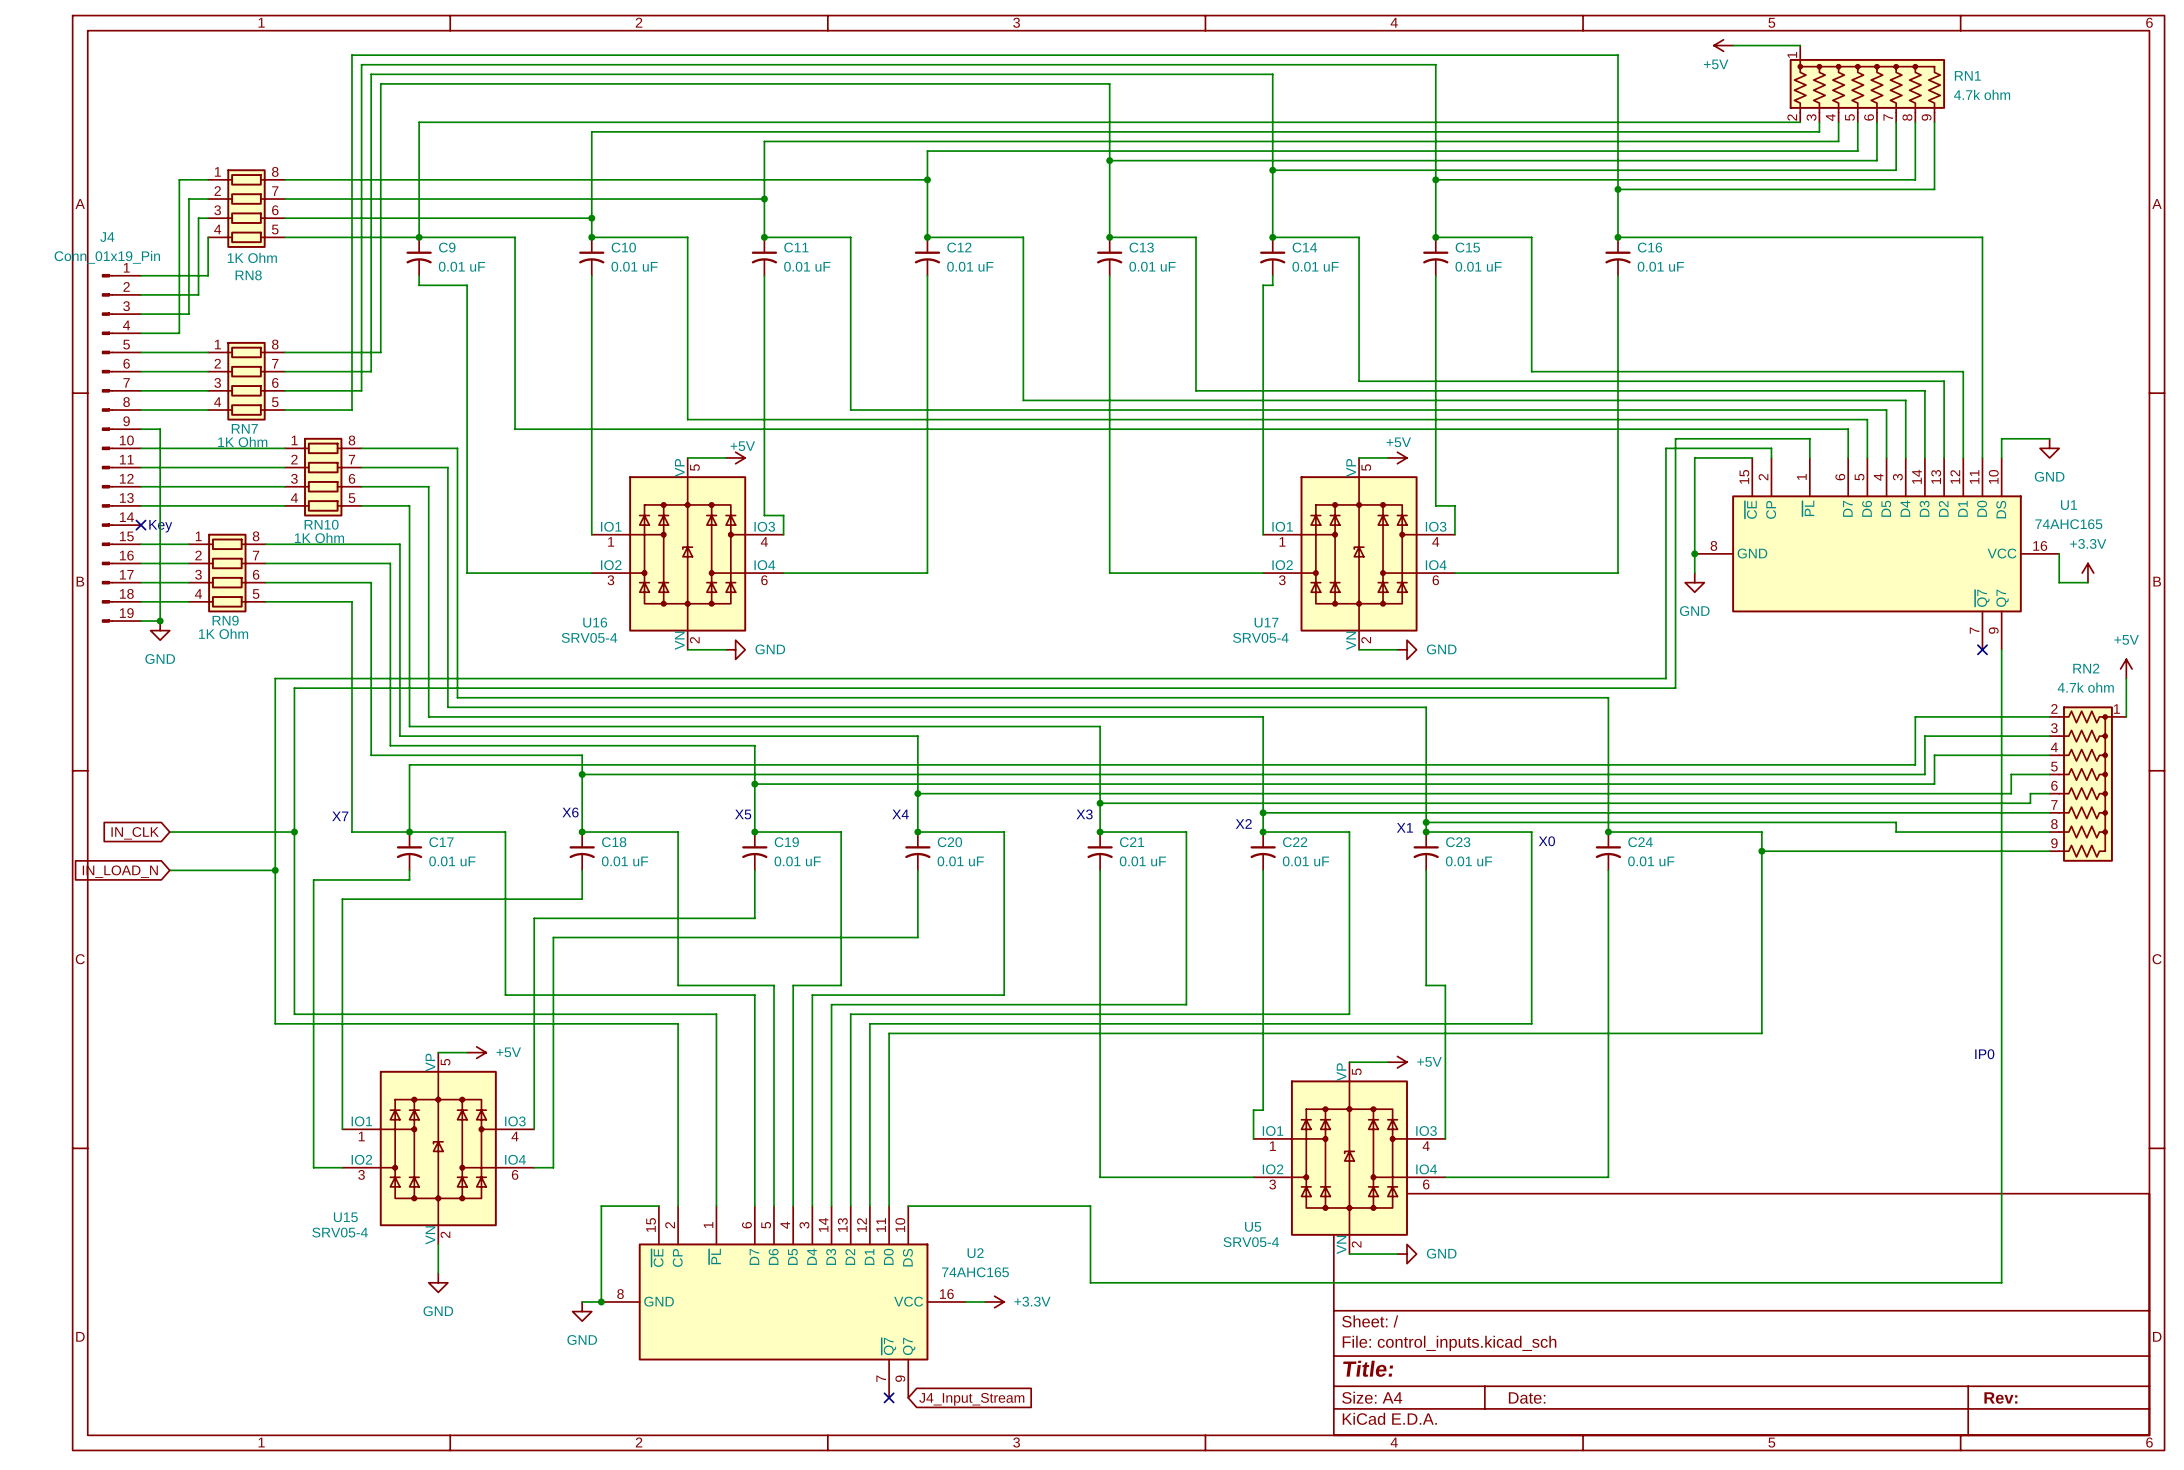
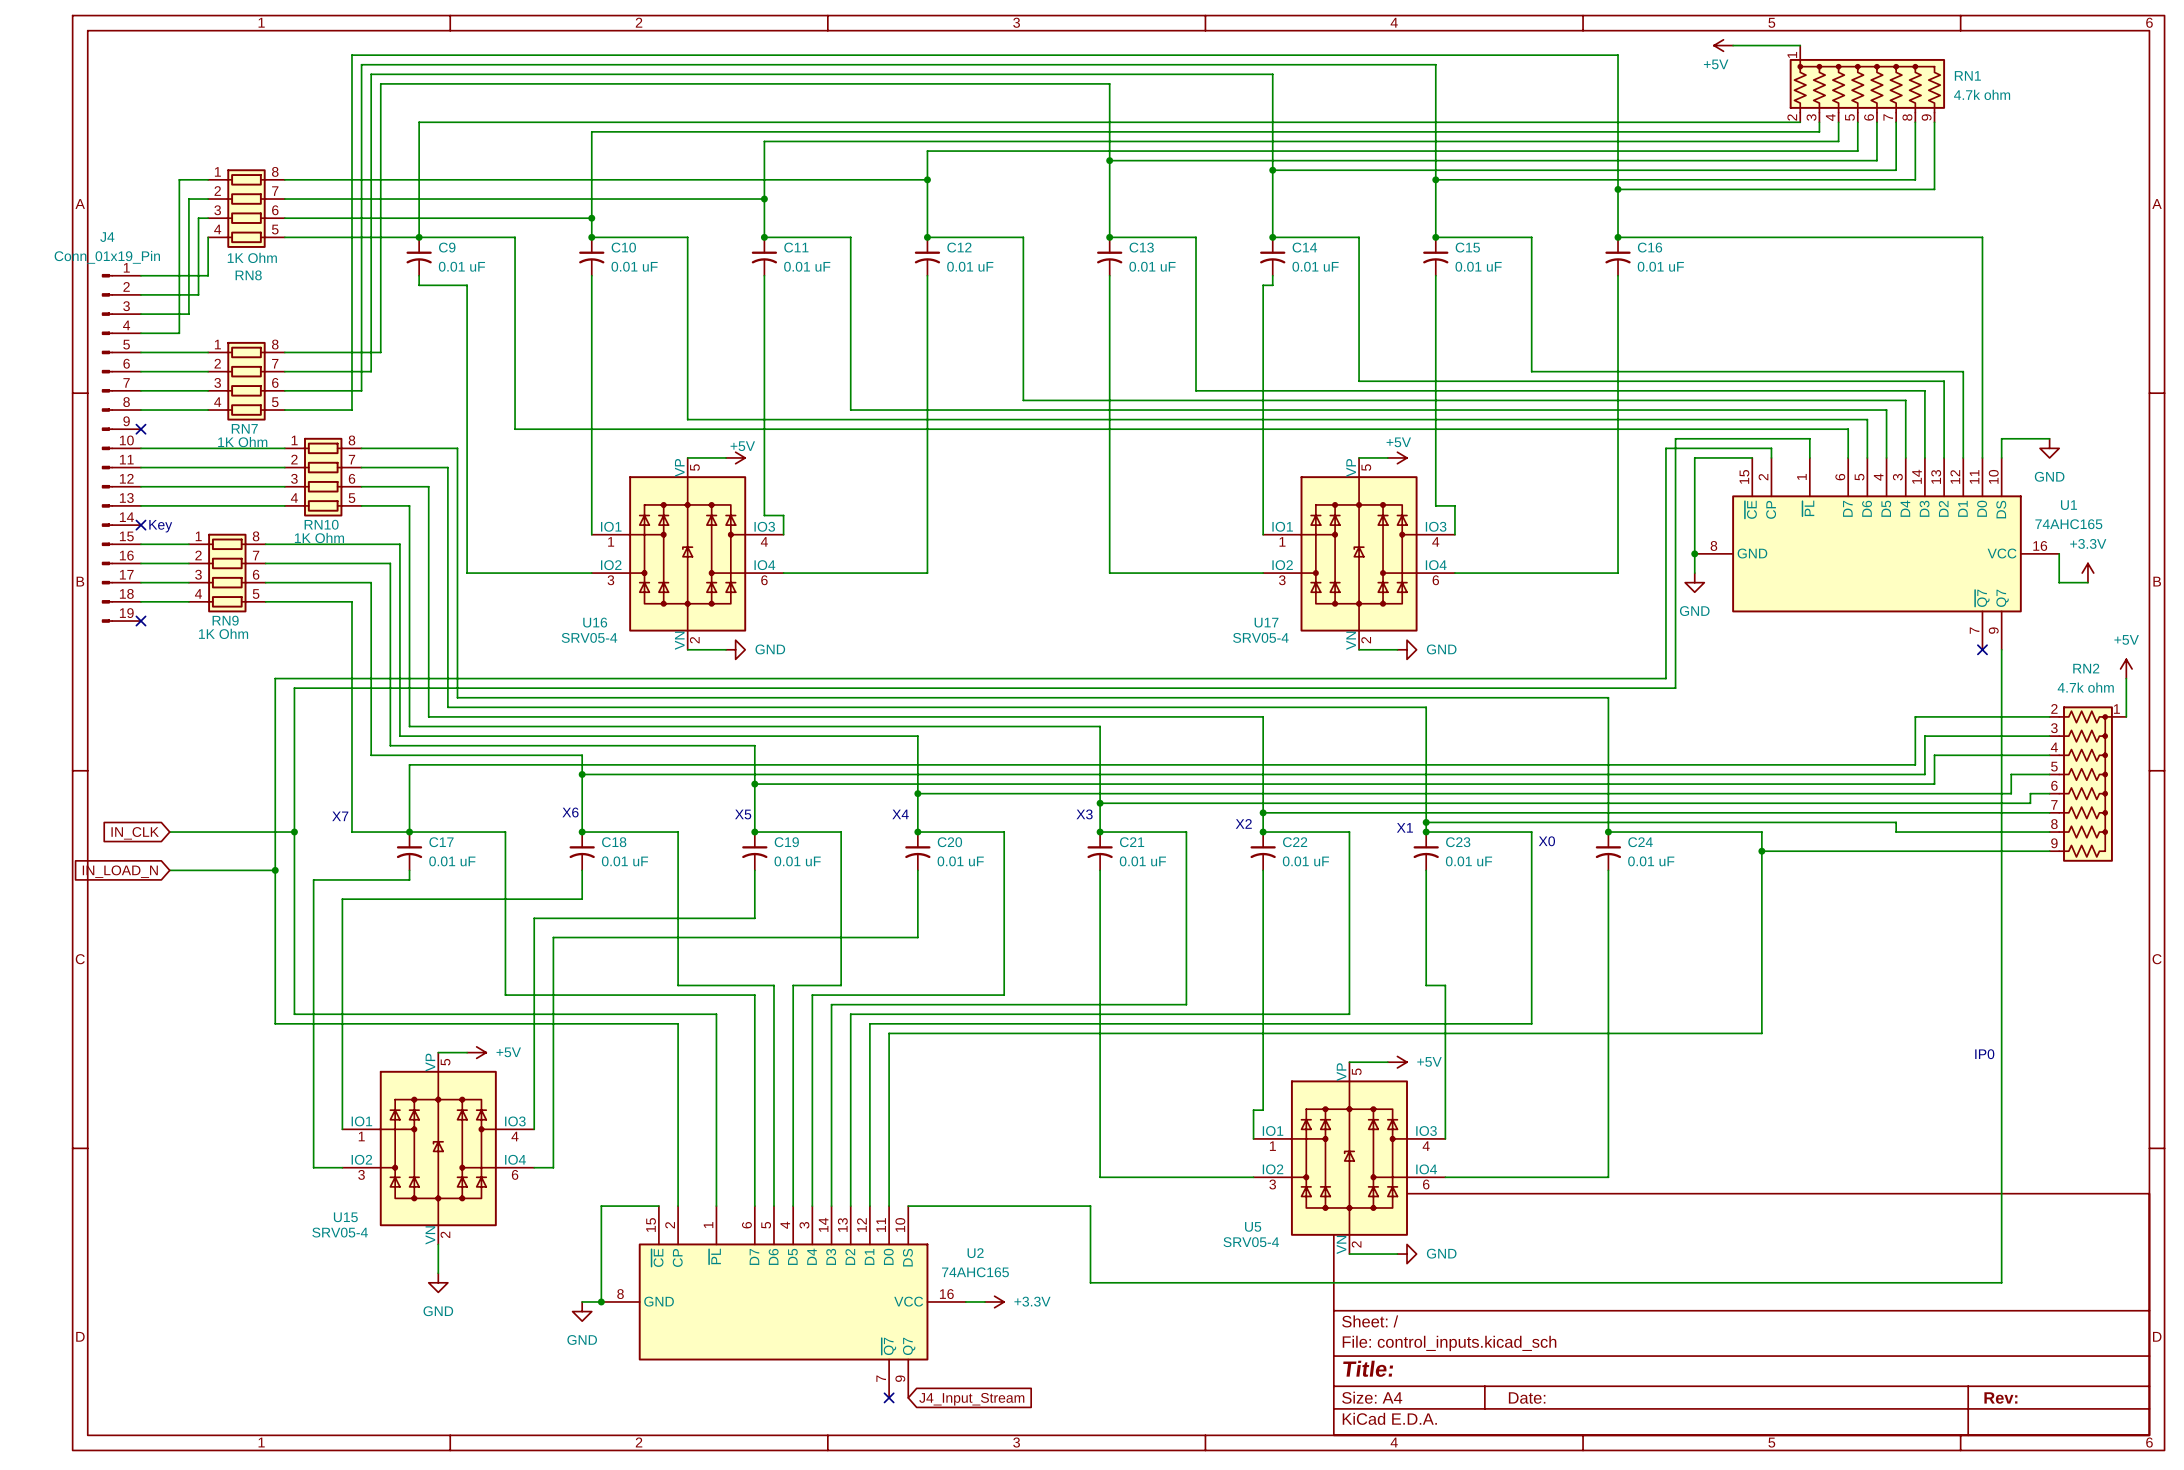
wire: (140, 429) (160, 429) (160, 621) (140, 621) -> none
no-connect mark: none -> (140, 429)
no-connect mark: none -> (140, 621)
junction: (160, 621) -> none
power symbol: GND (160, 630) -> none

